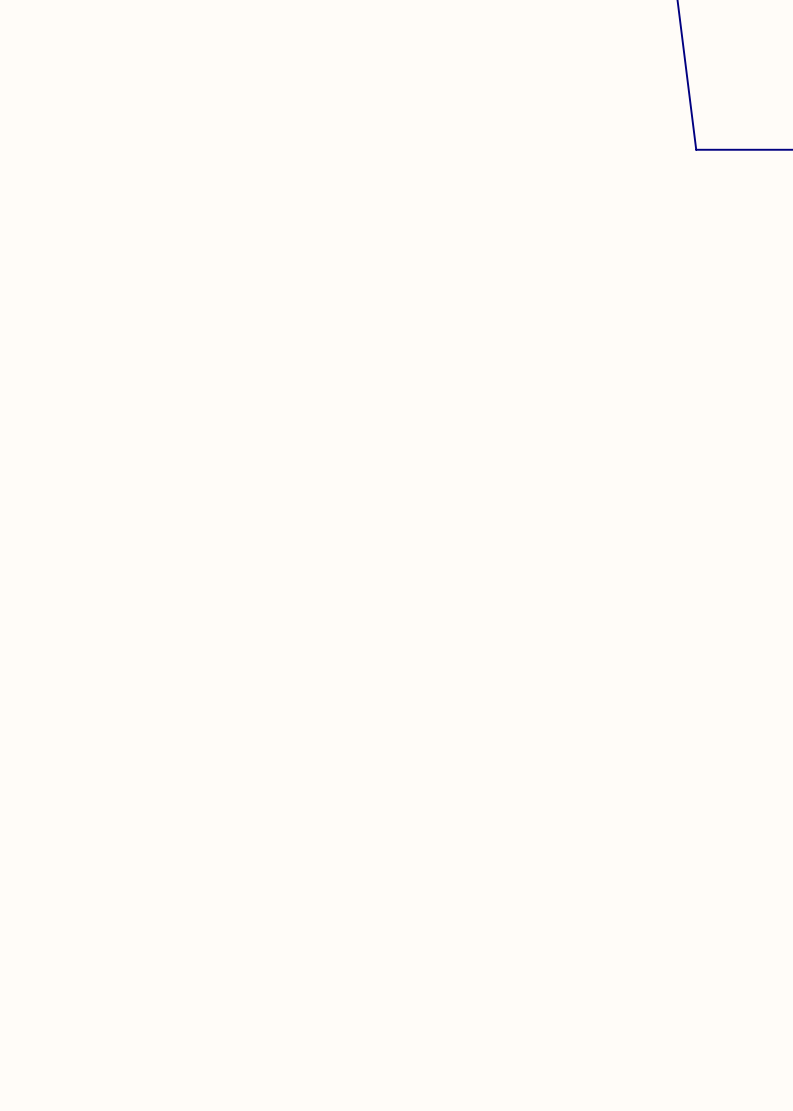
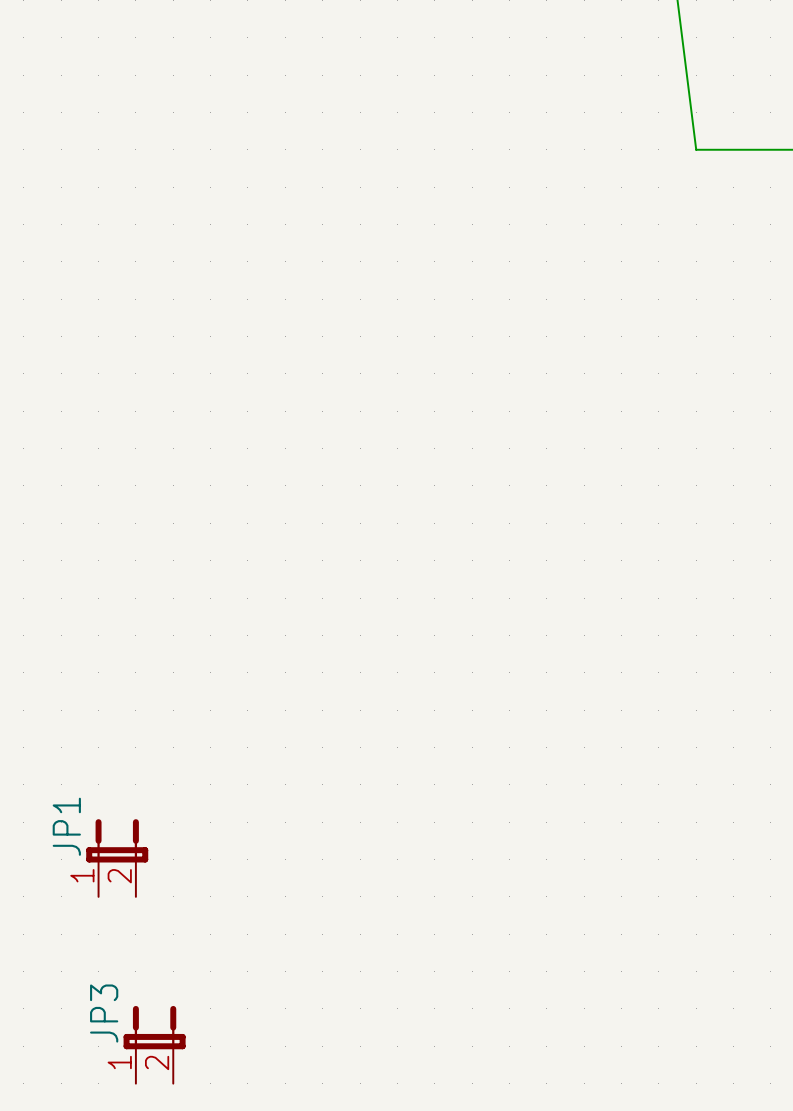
JP1: none -> (117, 858)
JP3: none -> (154, 1044)

